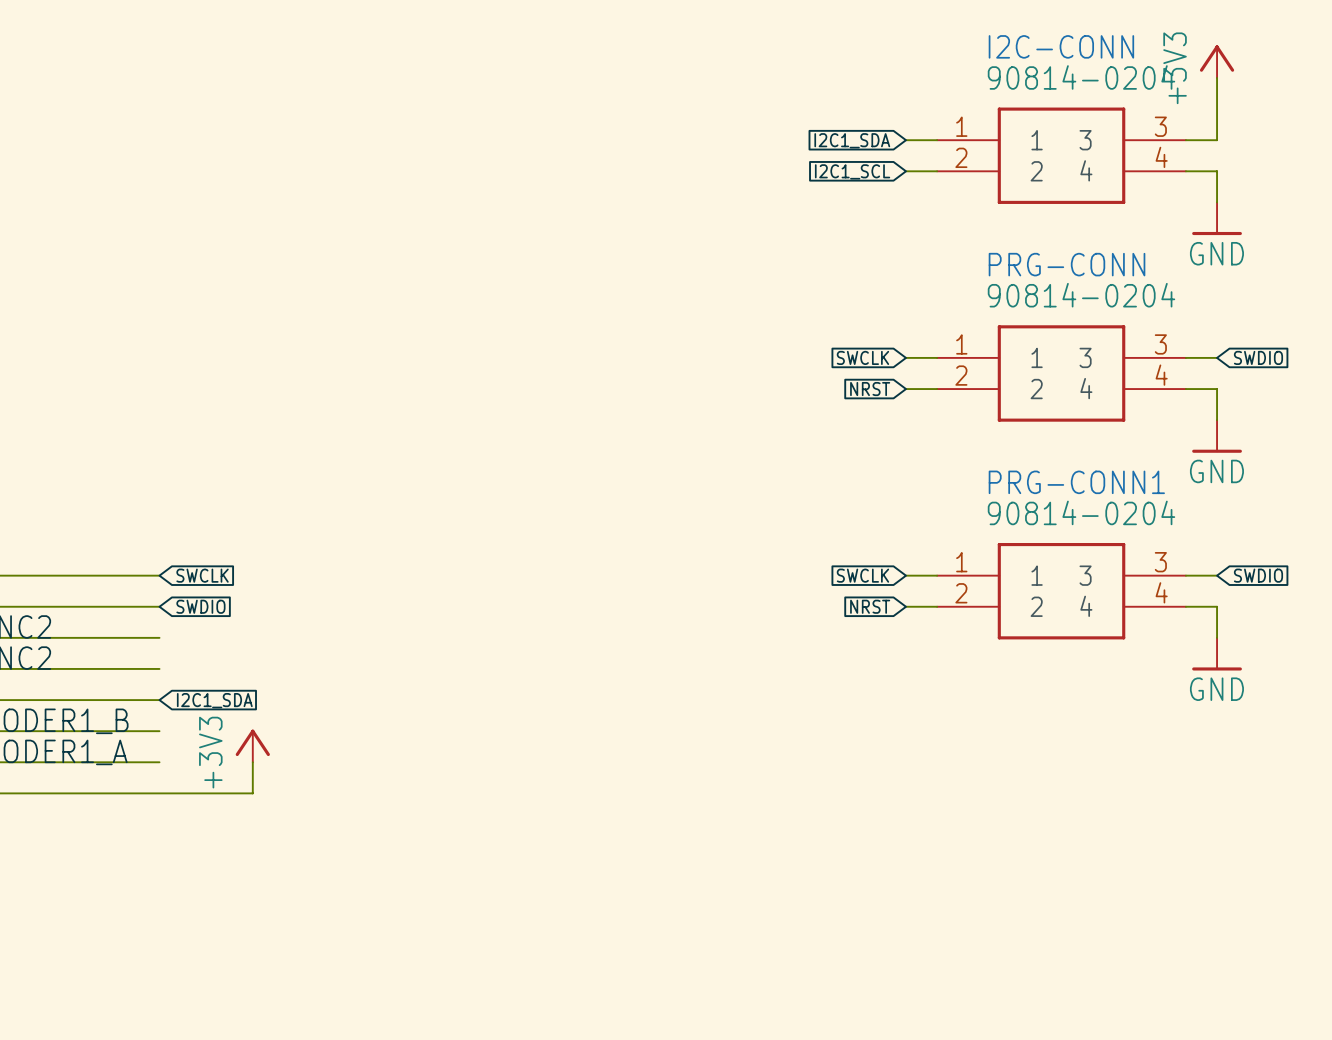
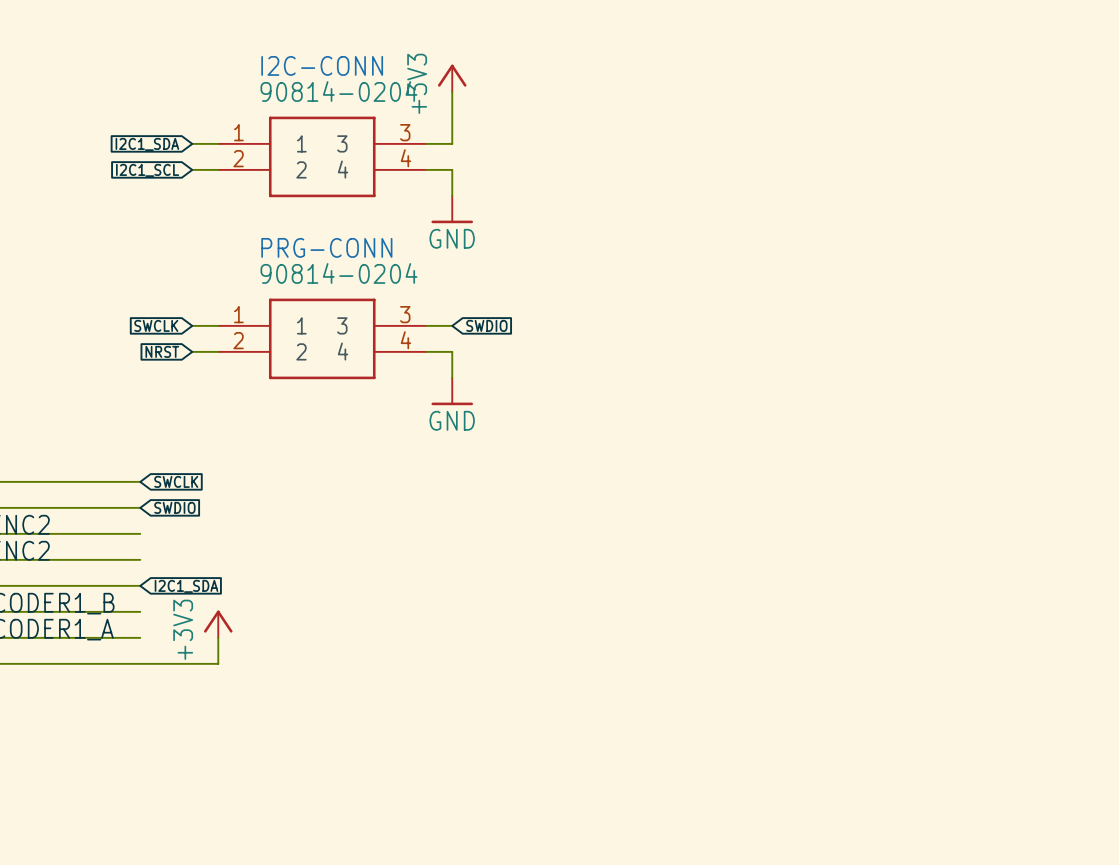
power symbol: +3V3 (1217, 61) -> none
wire: (1217, 77) (1217, 140) (1185, 140) -> none
power symbol: none -> +3V3 (452, 78)
wire: none -> (452, 91) (452, 143) (426, 143)
global label: I2C1_SDA (852, 140) -> none
wire: (906, 140) (937, 140) -> none
I2C-CONN position: (1061, 155) -> (322, 156)
global label: none -> I2C1_SDA (147, 144)
wire: none -> (192, 143) (218, 143)
global label: I2C1_SCL (852, 171) -> none
wire: (906, 171) (937, 171) -> none
wire: (1185, 171) (1217, 171) (1217, 202) -> none
wire: none -> (192, 169) (218, 169)
wire: none -> (426, 169) (452, 169) (452, 195)
global label: none -> I2C1_SCL (147, 170)
power symbol: GND (1217, 218) -> none
power symbol: none -> GND (452, 209)
global label: SWCLK (862, 357) -> none
wire: (906, 357) (937, 357) -> none
wire: (1185, 357) (1217, 357) -> none
global label: SWDIO (1258, 357) -> none
PRG-CONN: 90814-0204 (1061, 373) -> none
global label: none -> SWCLK (156, 325)
wire: none -> (192, 325) (218, 325)
wire: none -> (426, 325) (452, 325)
global label: none -> SWDIO (486, 325)
global label: NRST (870, 389) -> none
wire: (906, 389) (937, 389) -> none
wire: (1185, 389) (1217, 389) (1217, 420) -> none
PRG-CONN: none -> 90814-0204 (322, 338)
global label: none -> NRST (162, 351)
wire: none -> (192, 351) (218, 351)
wire: none -> (426, 351) (452, 351) (452, 377)
power symbol: GND (1217, 436) -> none
power symbol: none -> GND (452, 391)
global label: SWCLK (862, 575) -> none
wire: (906, 575) (937, 575) -> none
wire: (1185, 575) (1217, 575) -> none
global label: SWDIO (1258, 575) -> none
PRG-CONN1: 90814-0204 (1061, 591) -> none
global label: NRST (870, 606) -> none
wire: (906, 606) (937, 606) -> none
wire: (1185, 606) (1217, 606) (1217, 637) -> none
power symbol: GND (1217, 654) -> none

